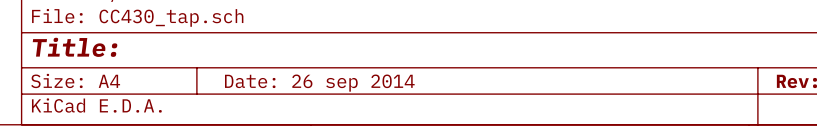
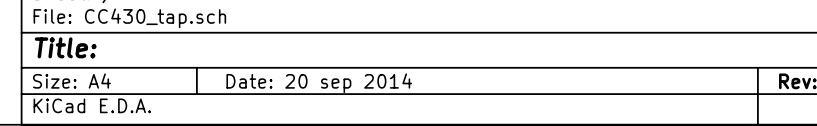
title block: Date: 26 sep 2014 (319, 83) -> Date: 20 sep 2014 (319, 83)

